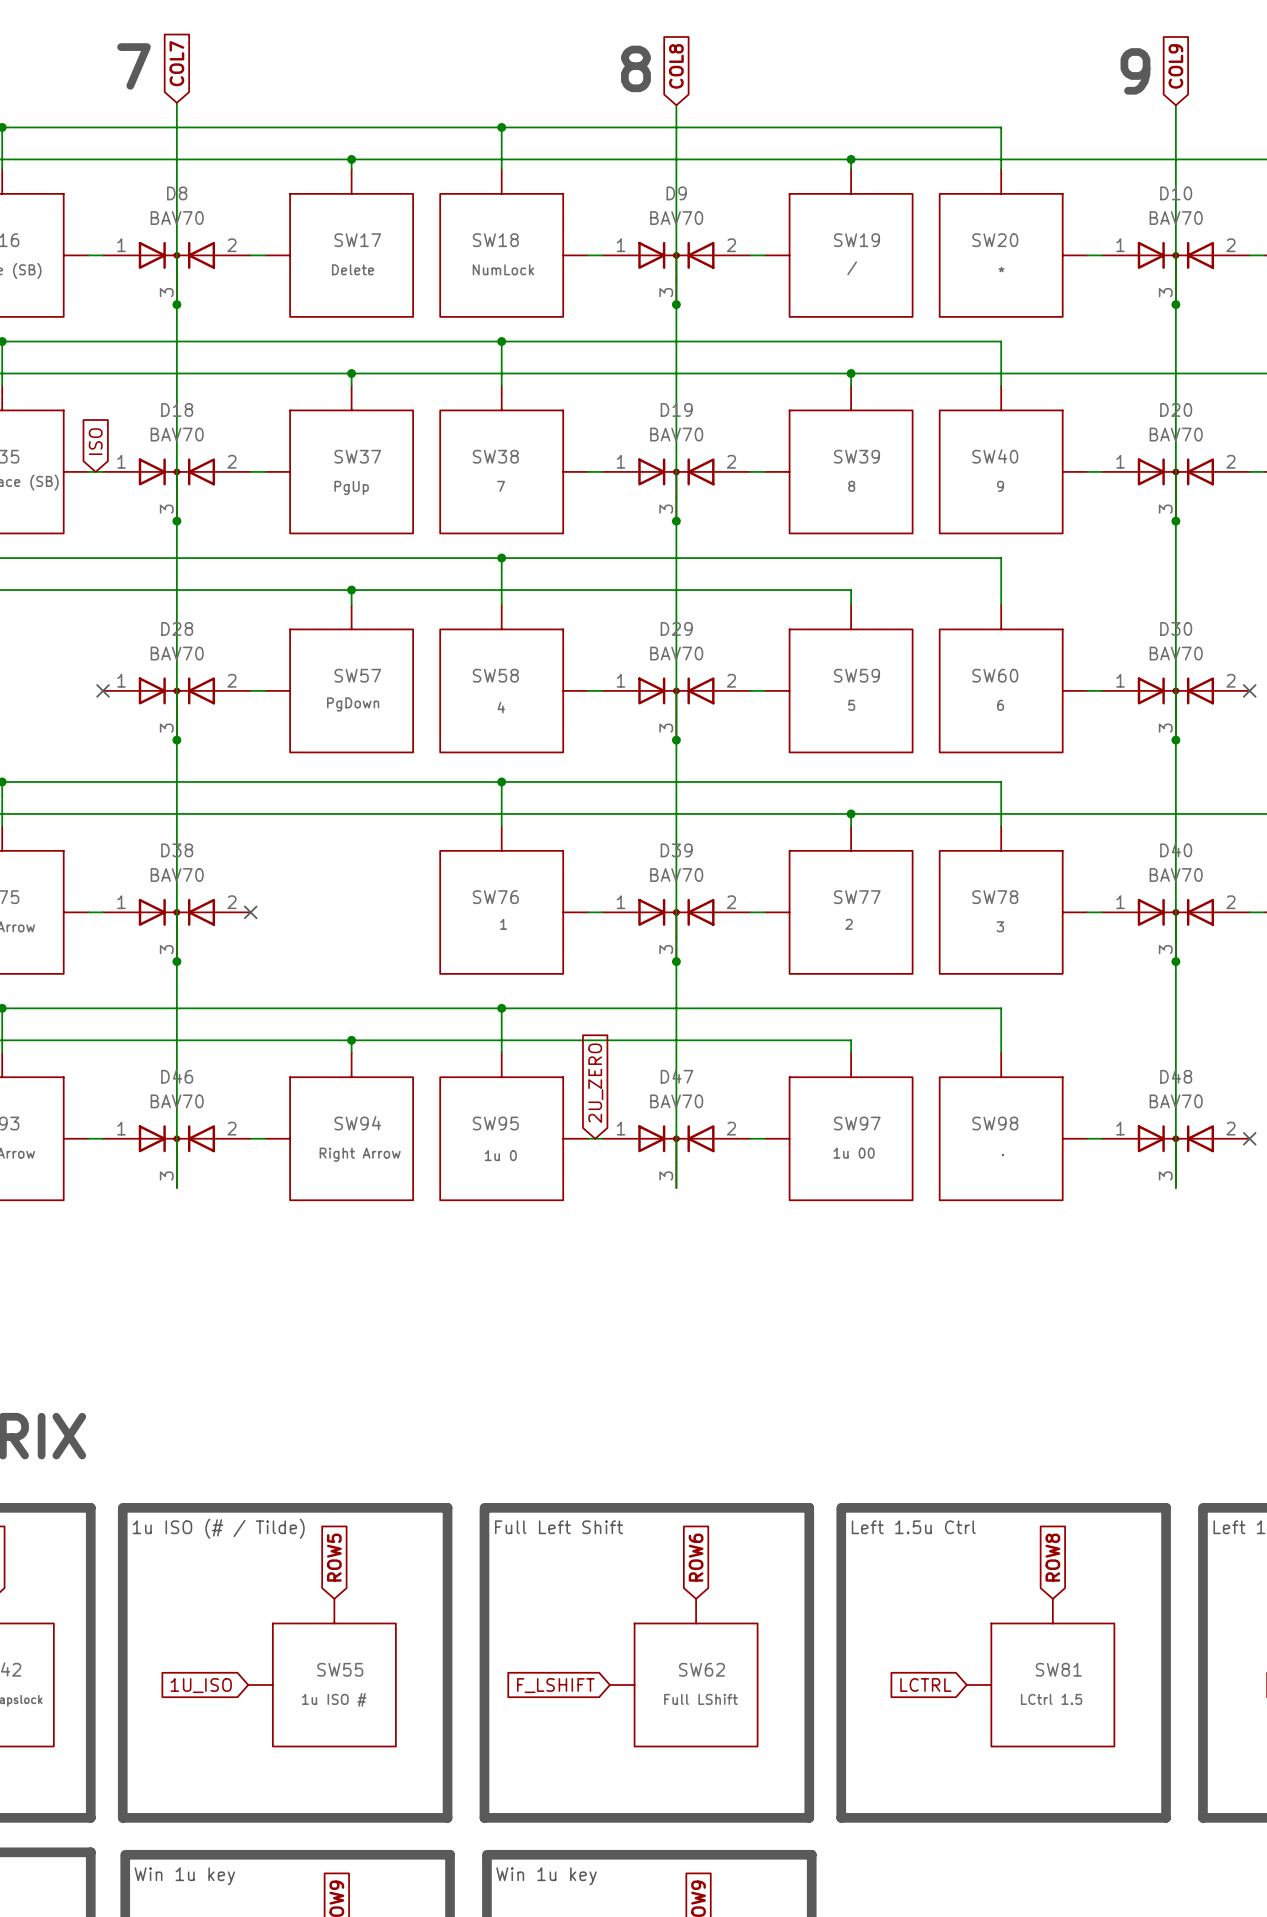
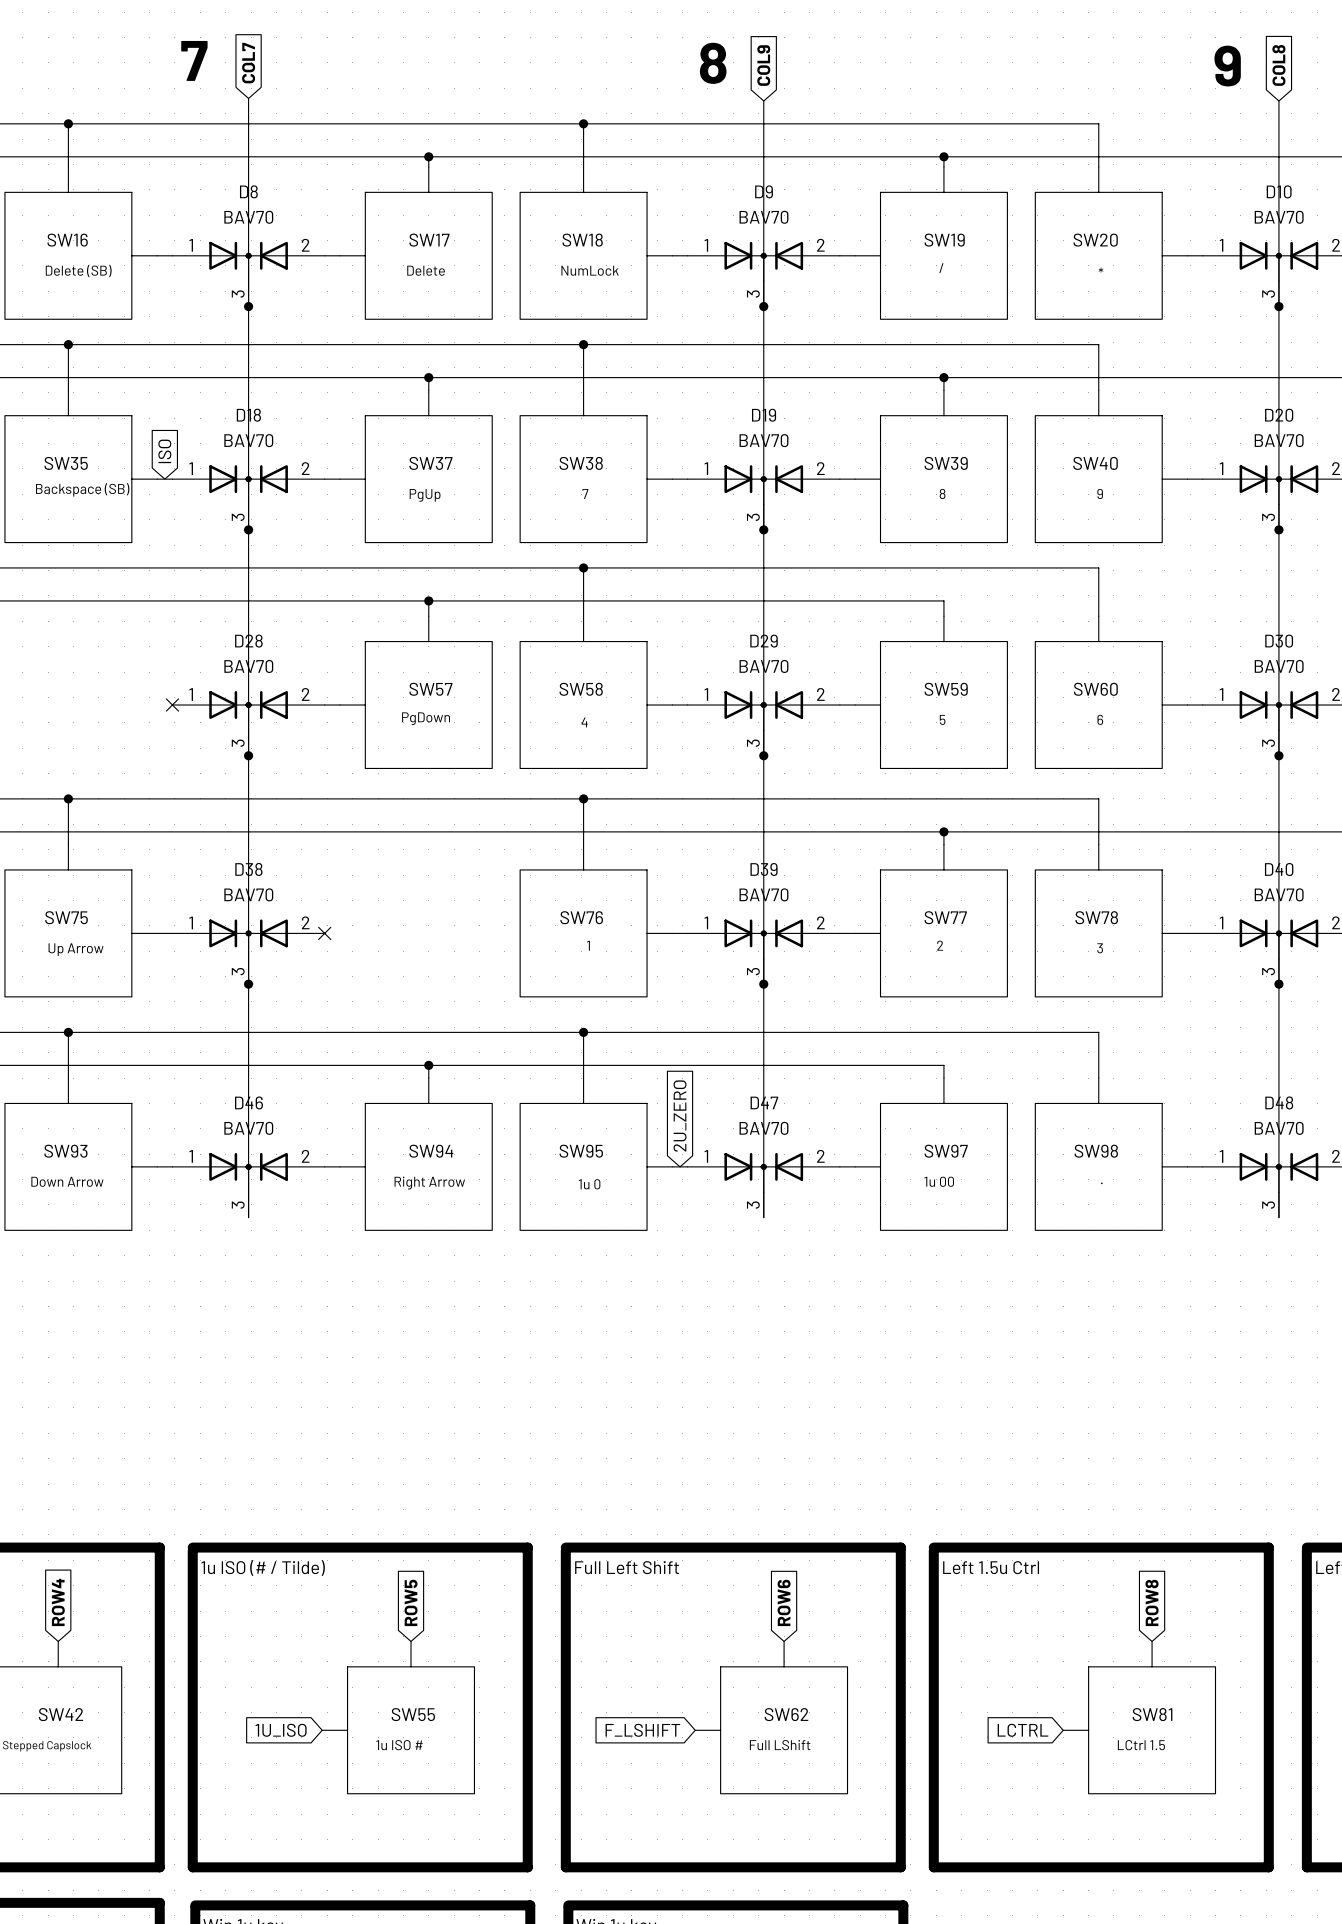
global label: COL8 (676, 66) -> COL9 (763, 65)
global label: COL9 (1175, 66) -> COL8 (1278, 65)

